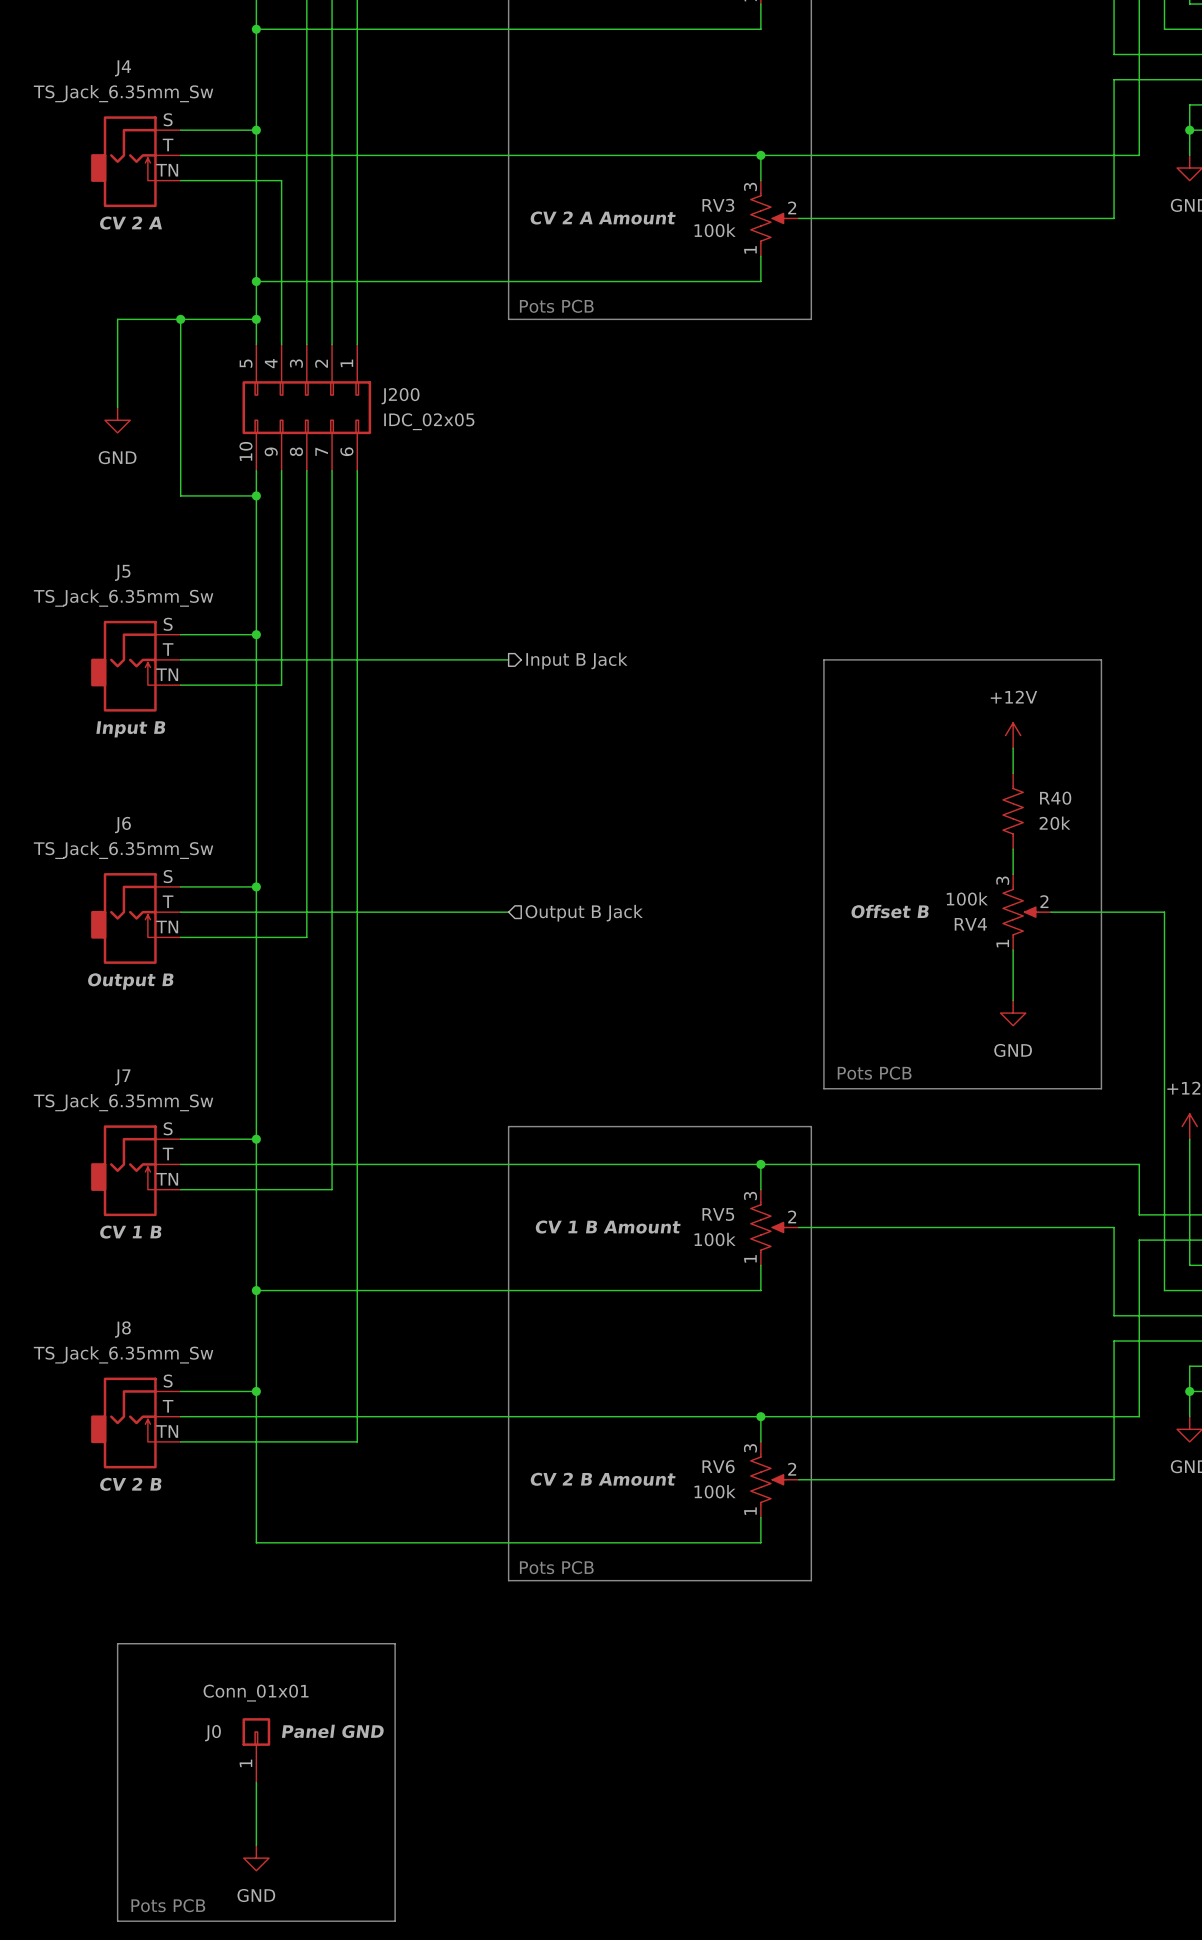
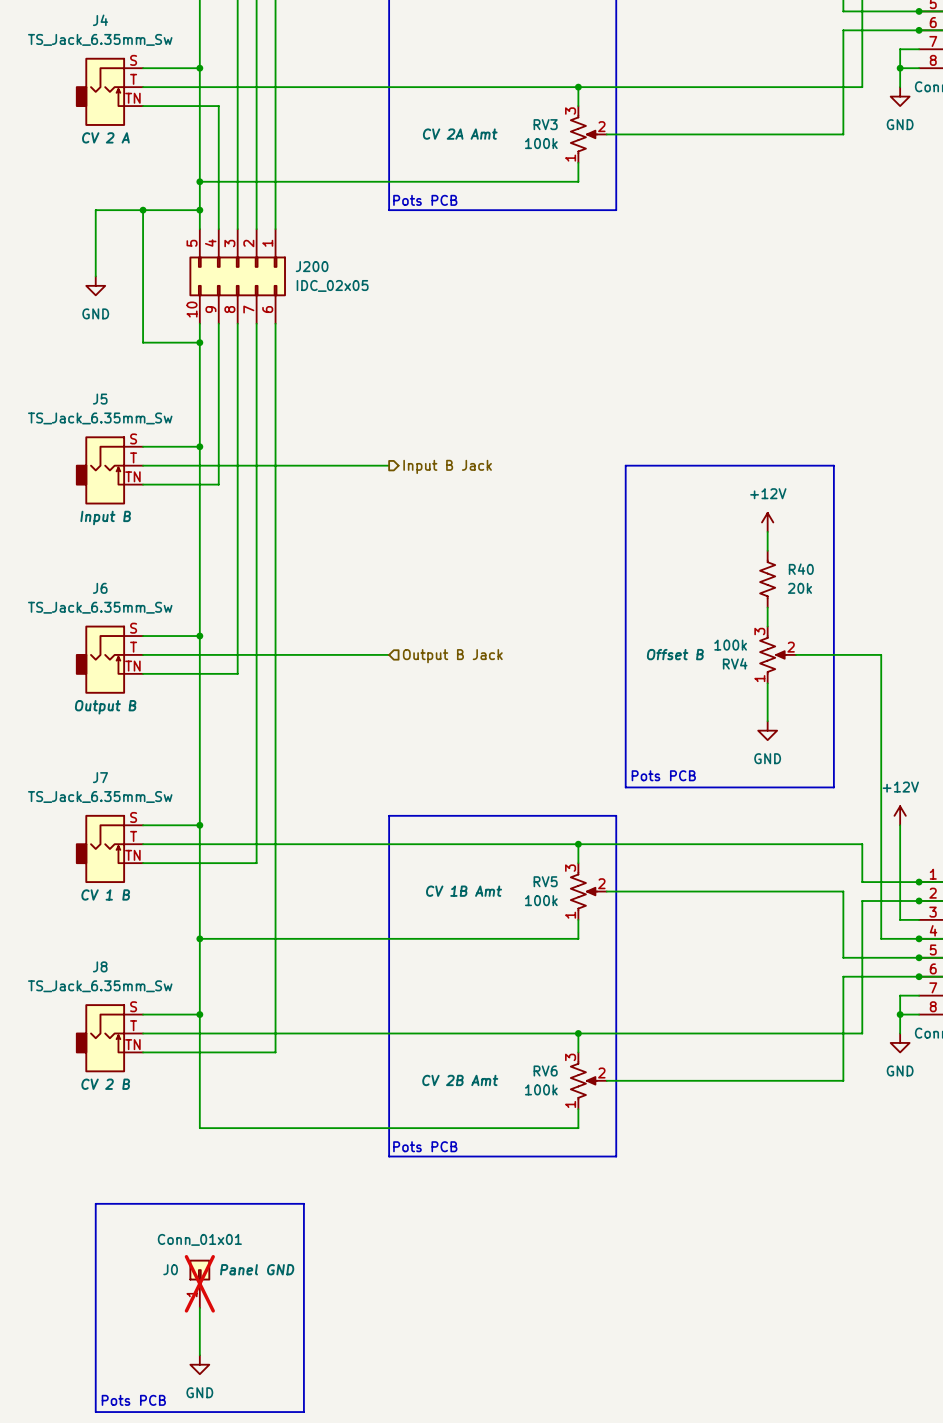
RV3 text: CV 2 A Amount (602, 218) -> CV 2A Amt (460, 134)
RV5 text: CV 1 B Amount (608, 1227) -> CV 1B Amt (464, 891)
RV6 text: CV 2 B Amount (602, 1479) -> CV 2B Amt (460, 1080)
J0 do-not-place cross: none -> (199, 1283)

